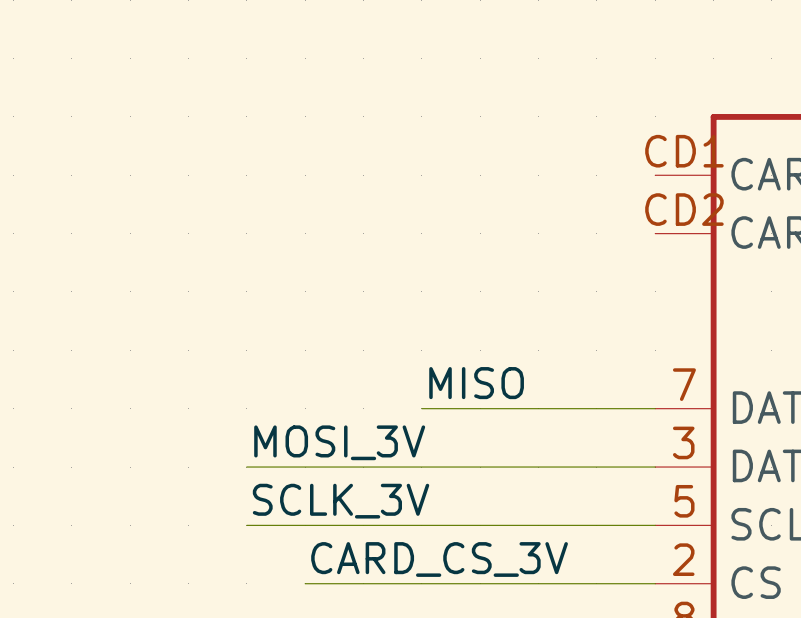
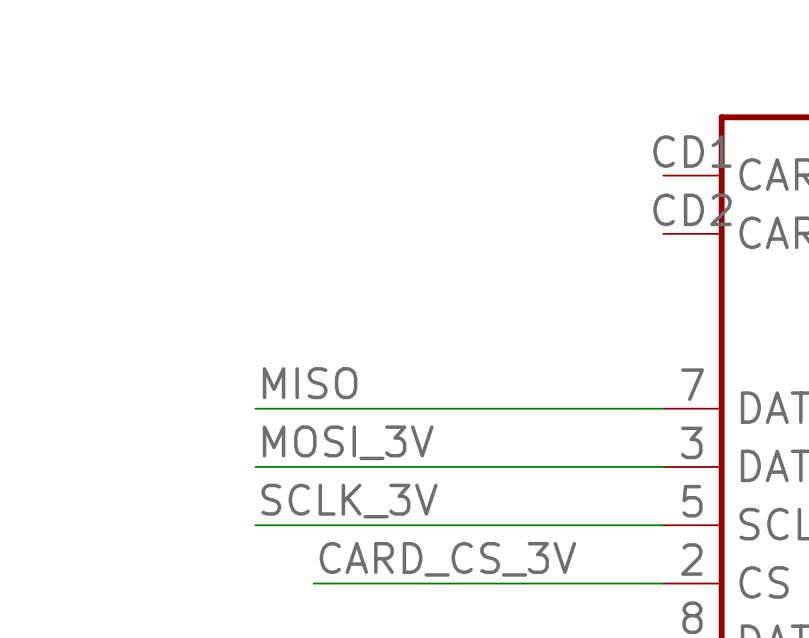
label position: MISO (476, 383) -> MISO (310, 383)
wire: none -> (255, 408) (430, 408)

